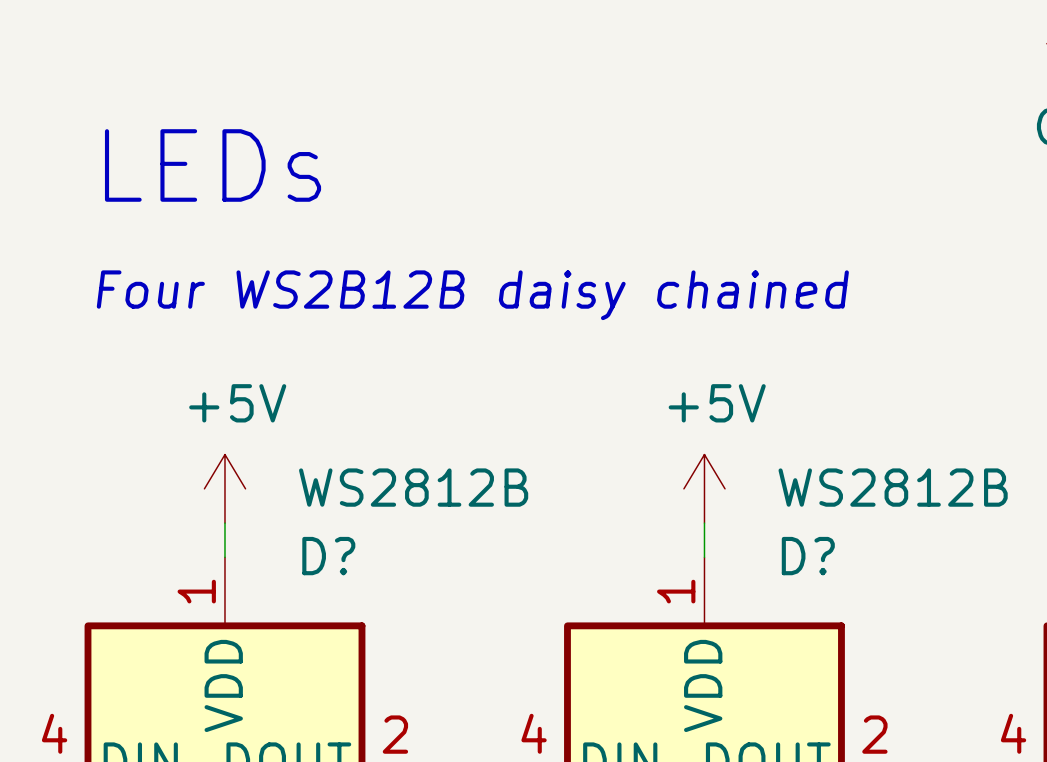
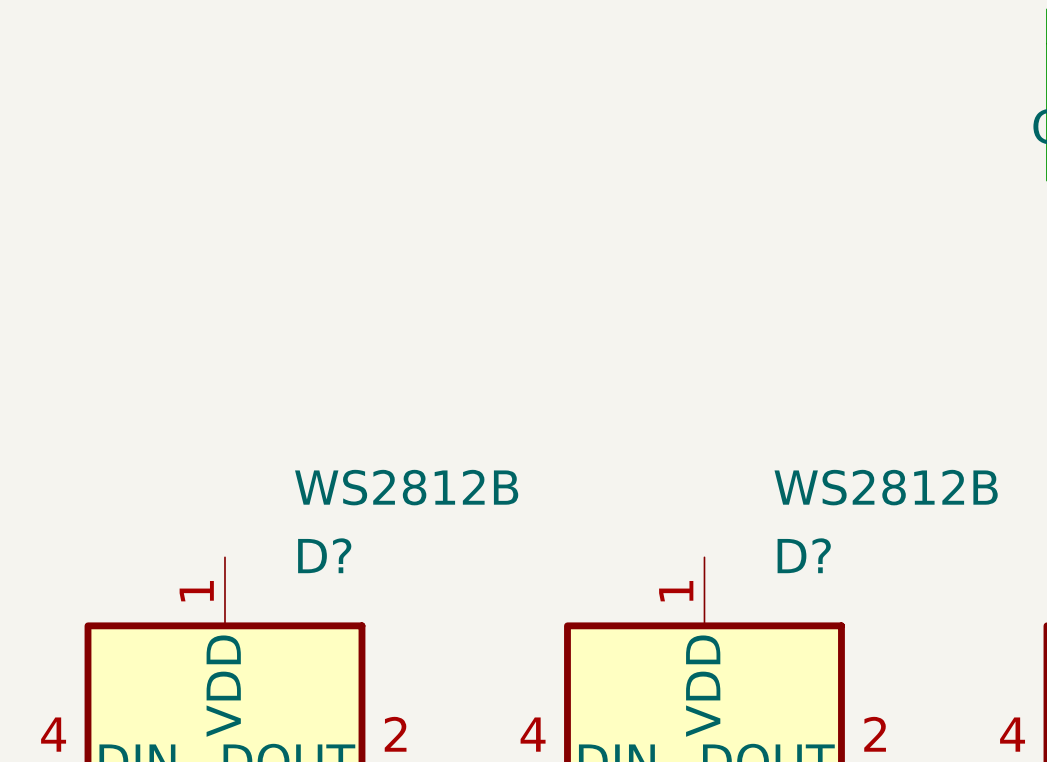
wire: none -> (1046, 9) (1046, 180)
text: LEDs (213, 165) -> none
text: Four WS2B12B daisy chained (472, 295) -> none
power symbol: +5V (224, 488) -> none
power symbol: +5V (704, 488) -> none
wire: (224, 523) (224, 557) -> none
wire: (704, 523) (704, 557) -> none

